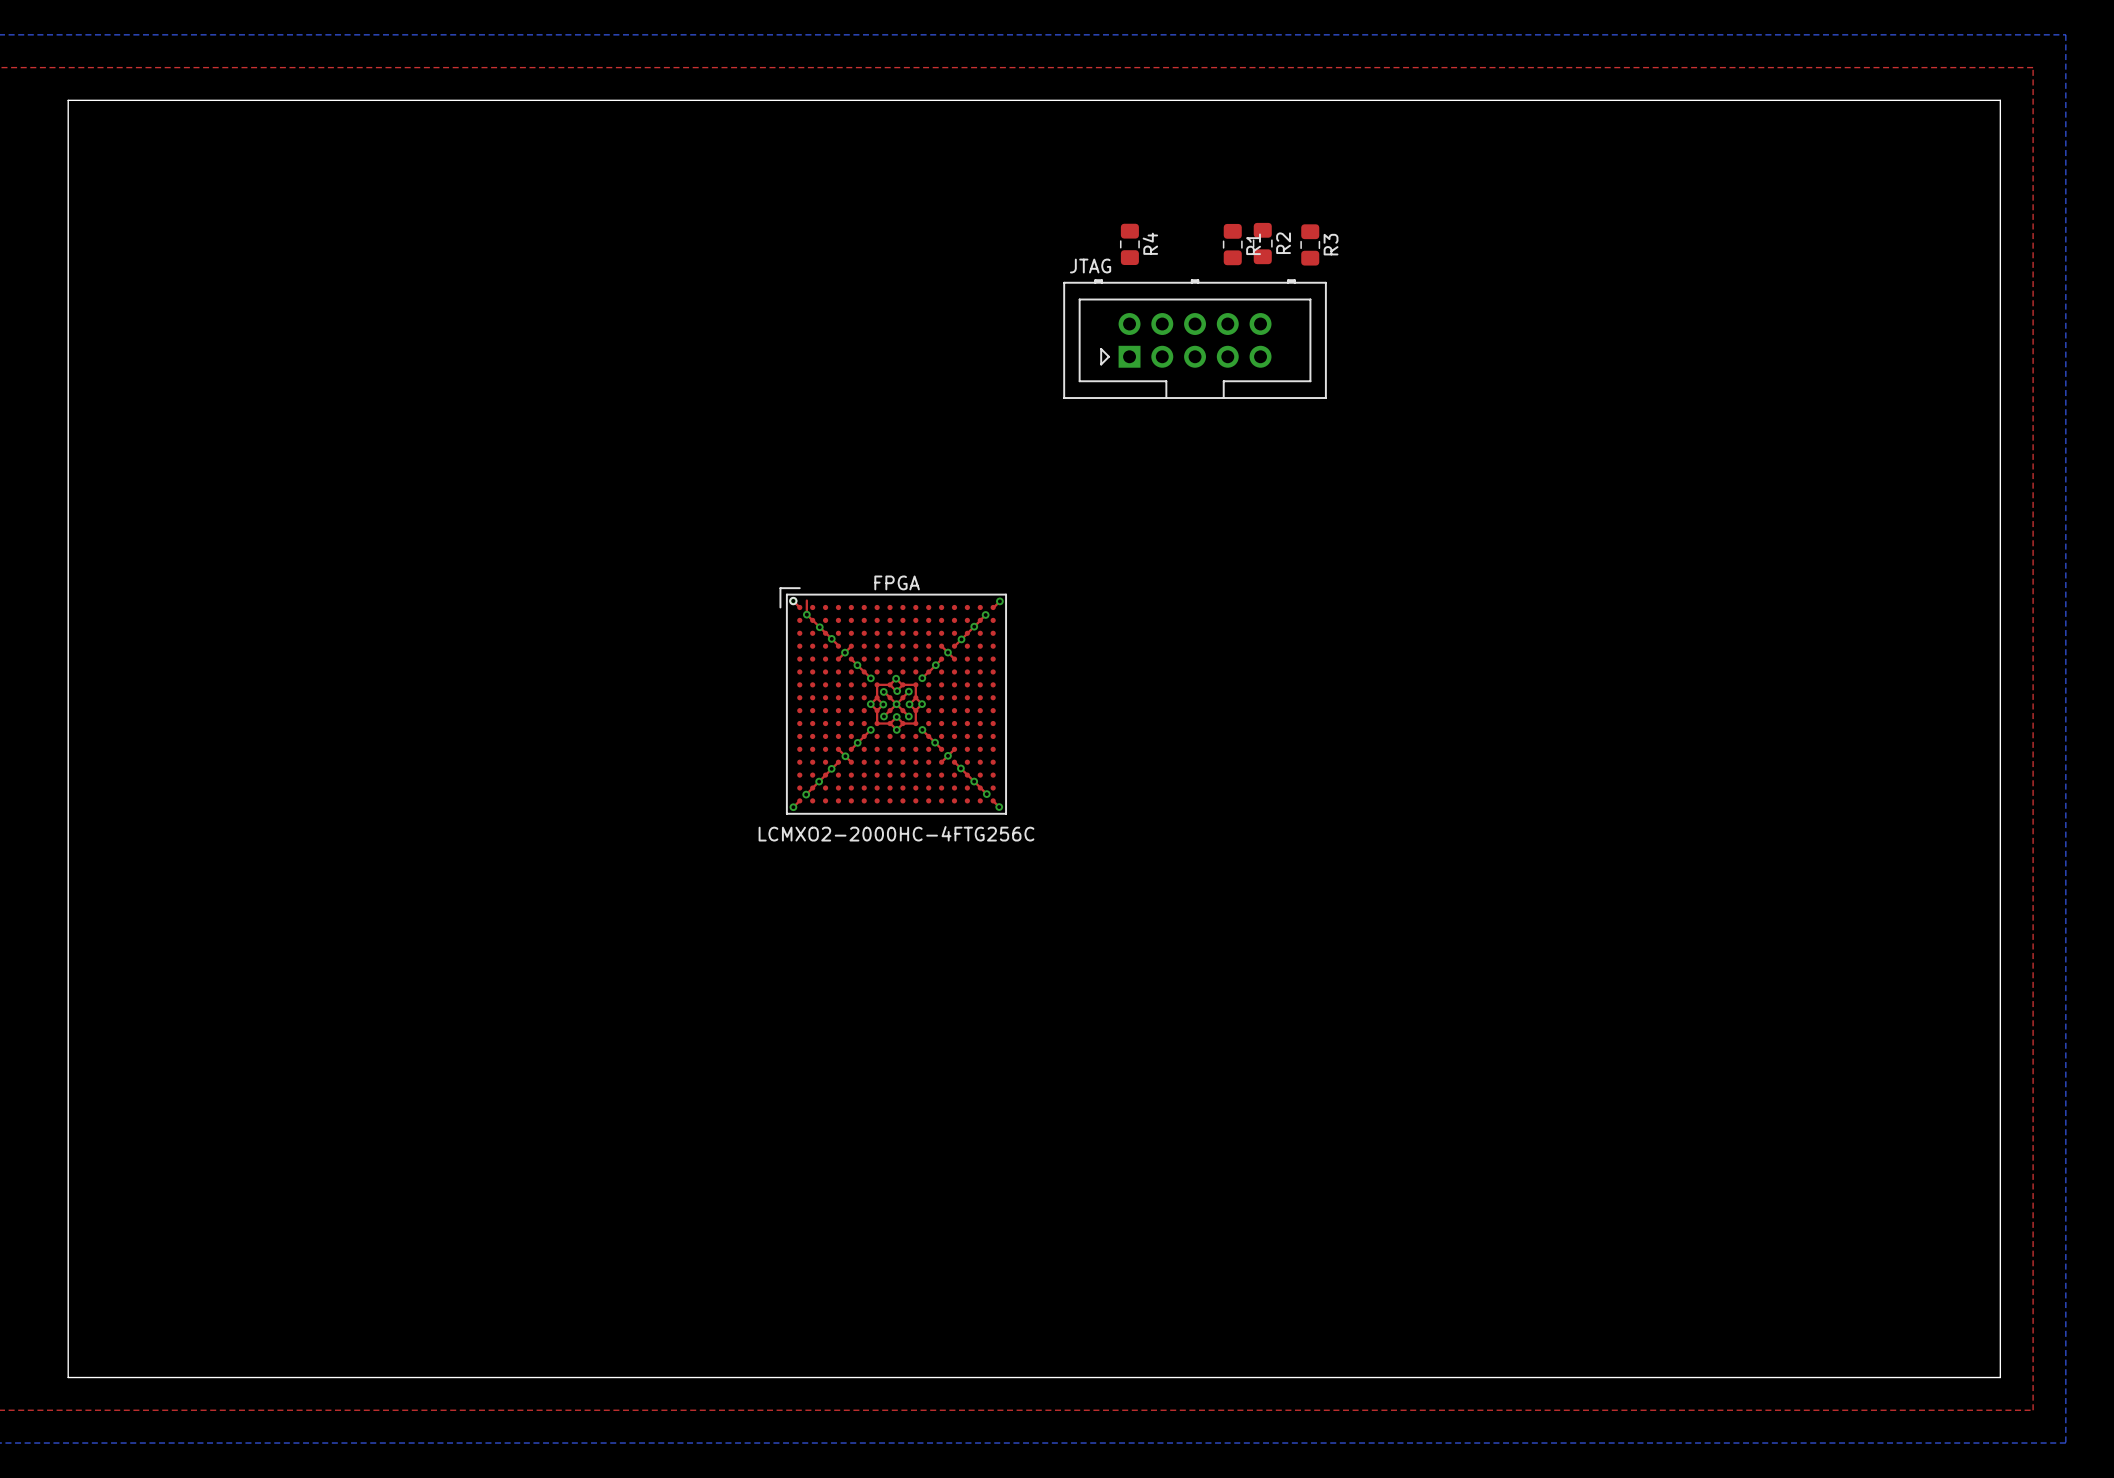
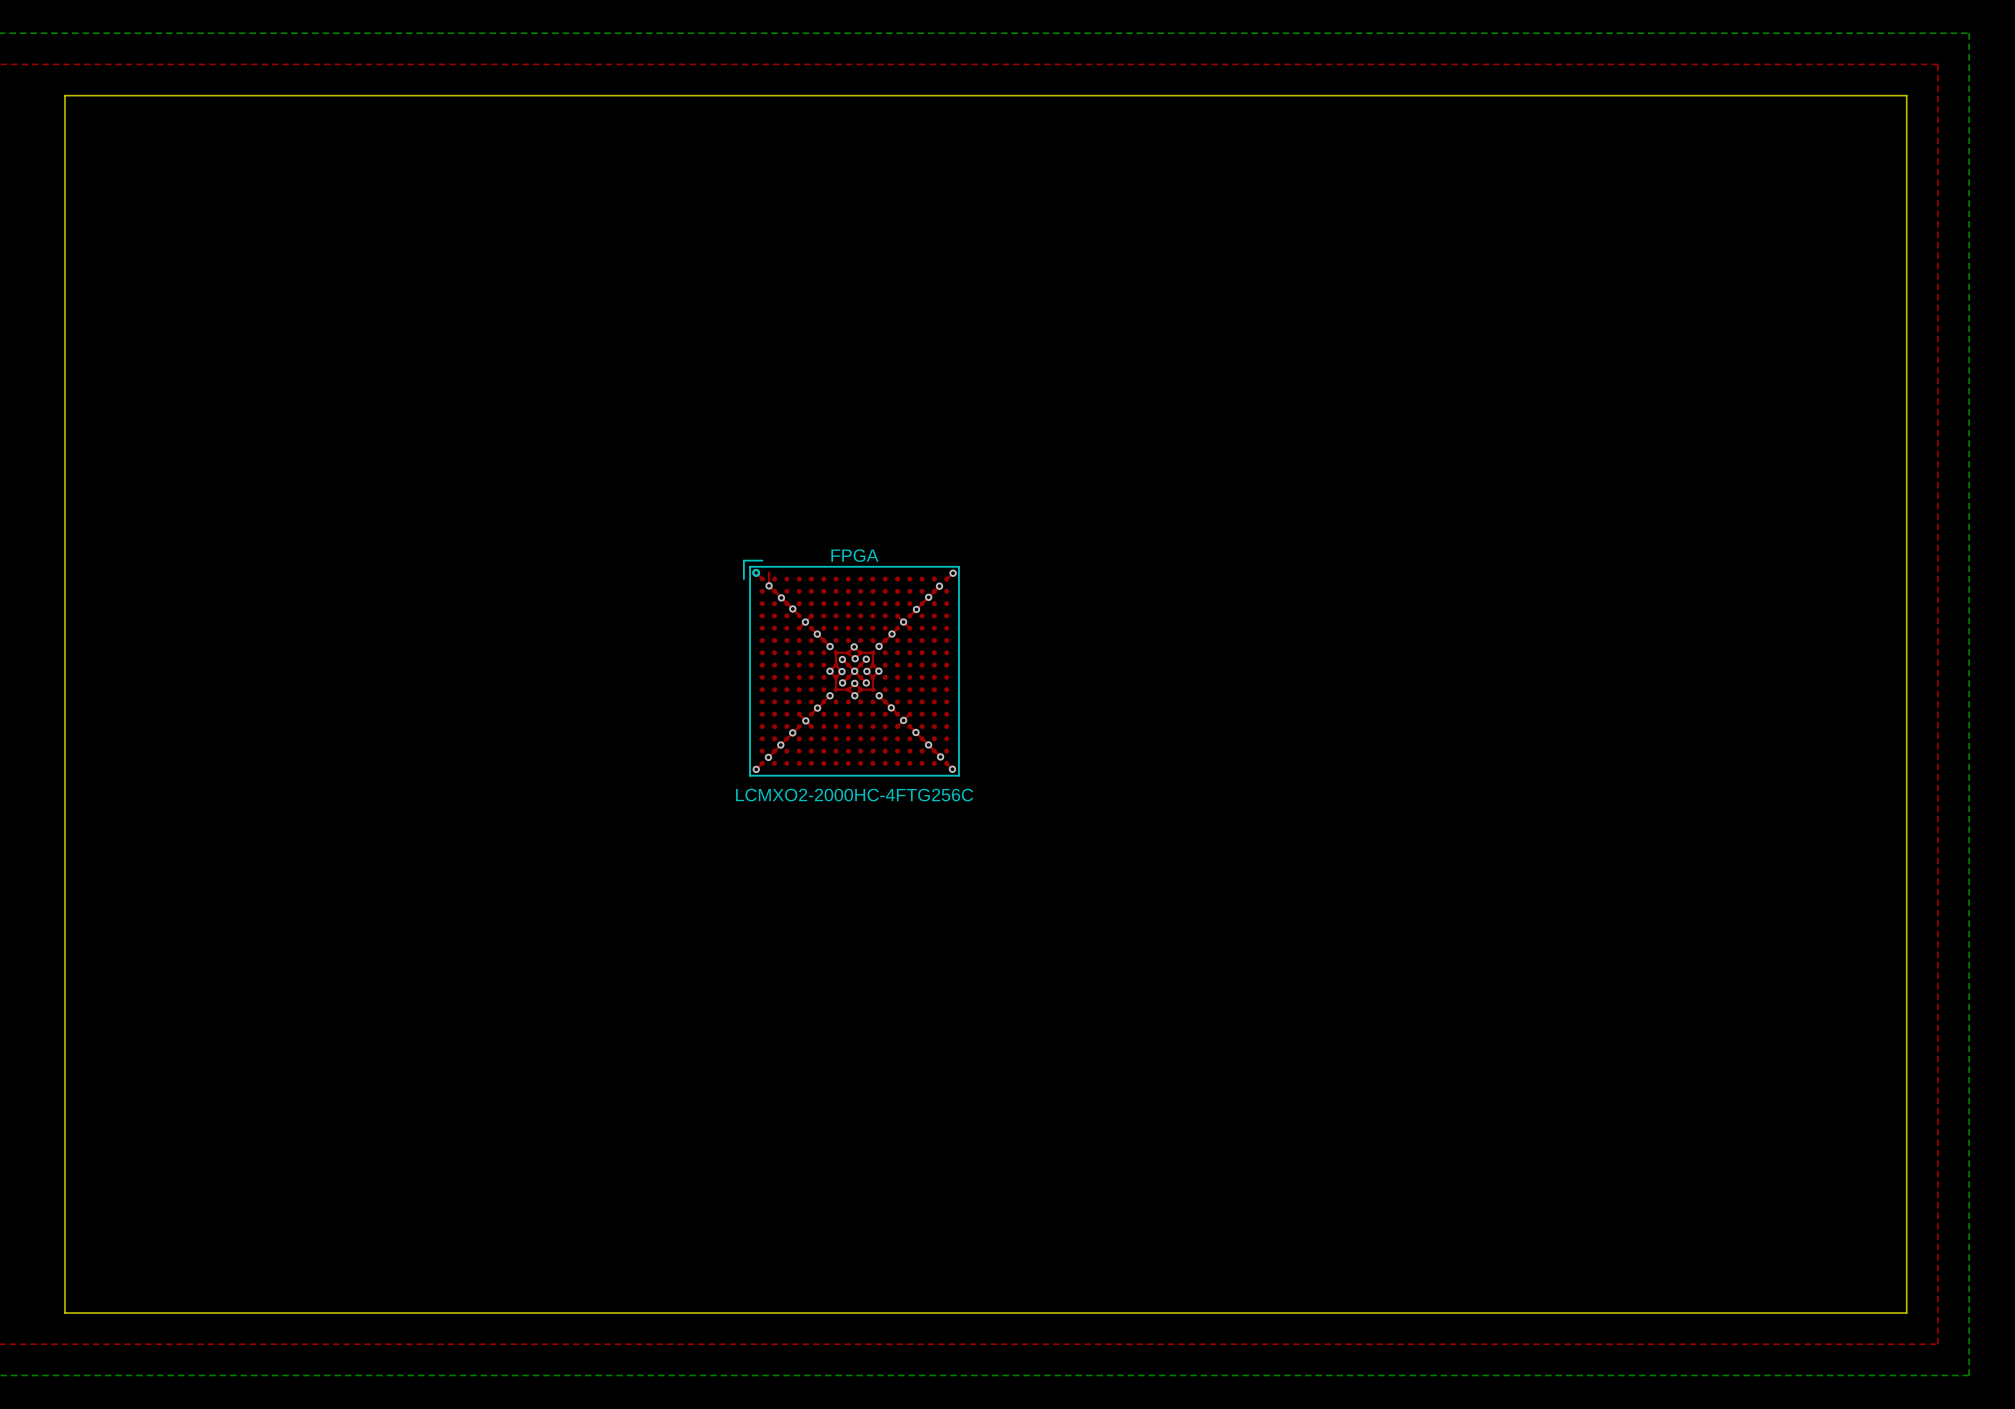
R2: (1262, 243) -> none
R4: (1129, 244) -> none
R1: (1232, 244) -> none
R3: (1310, 244) -> none
JTAG: (1195, 339) -> none

